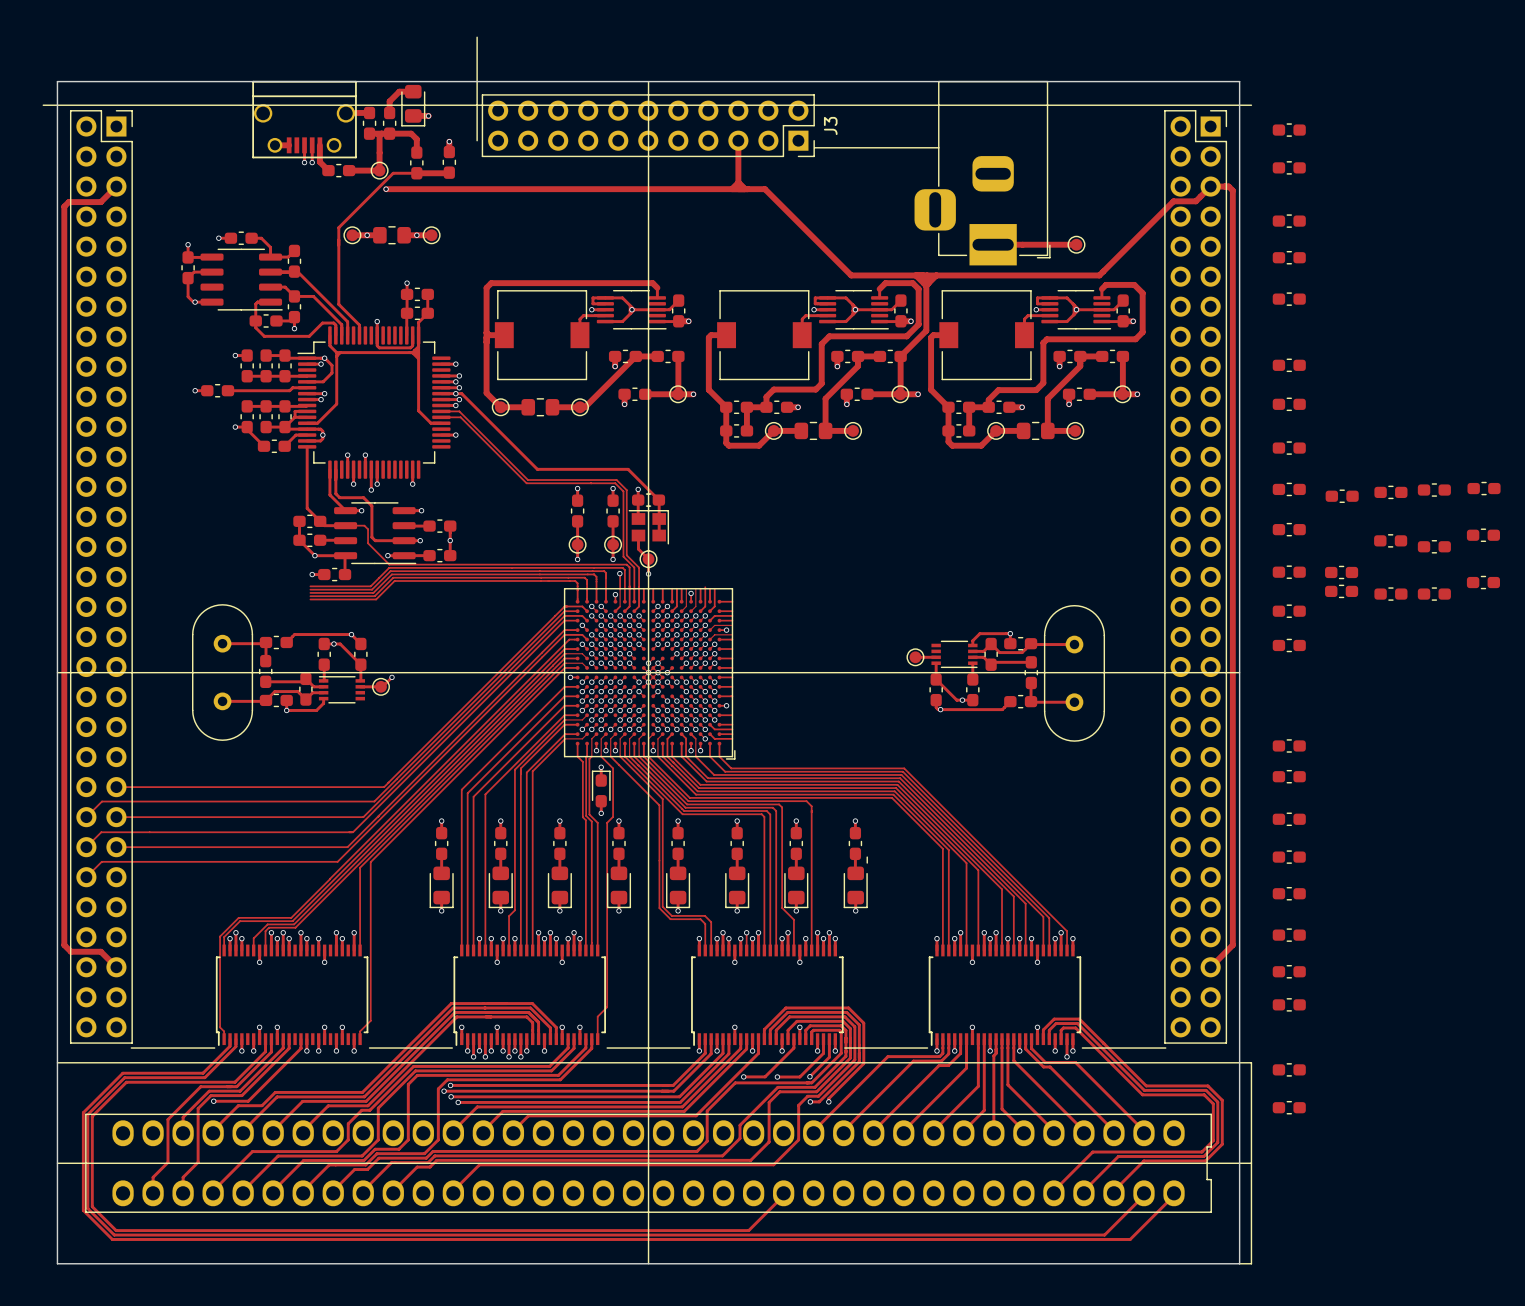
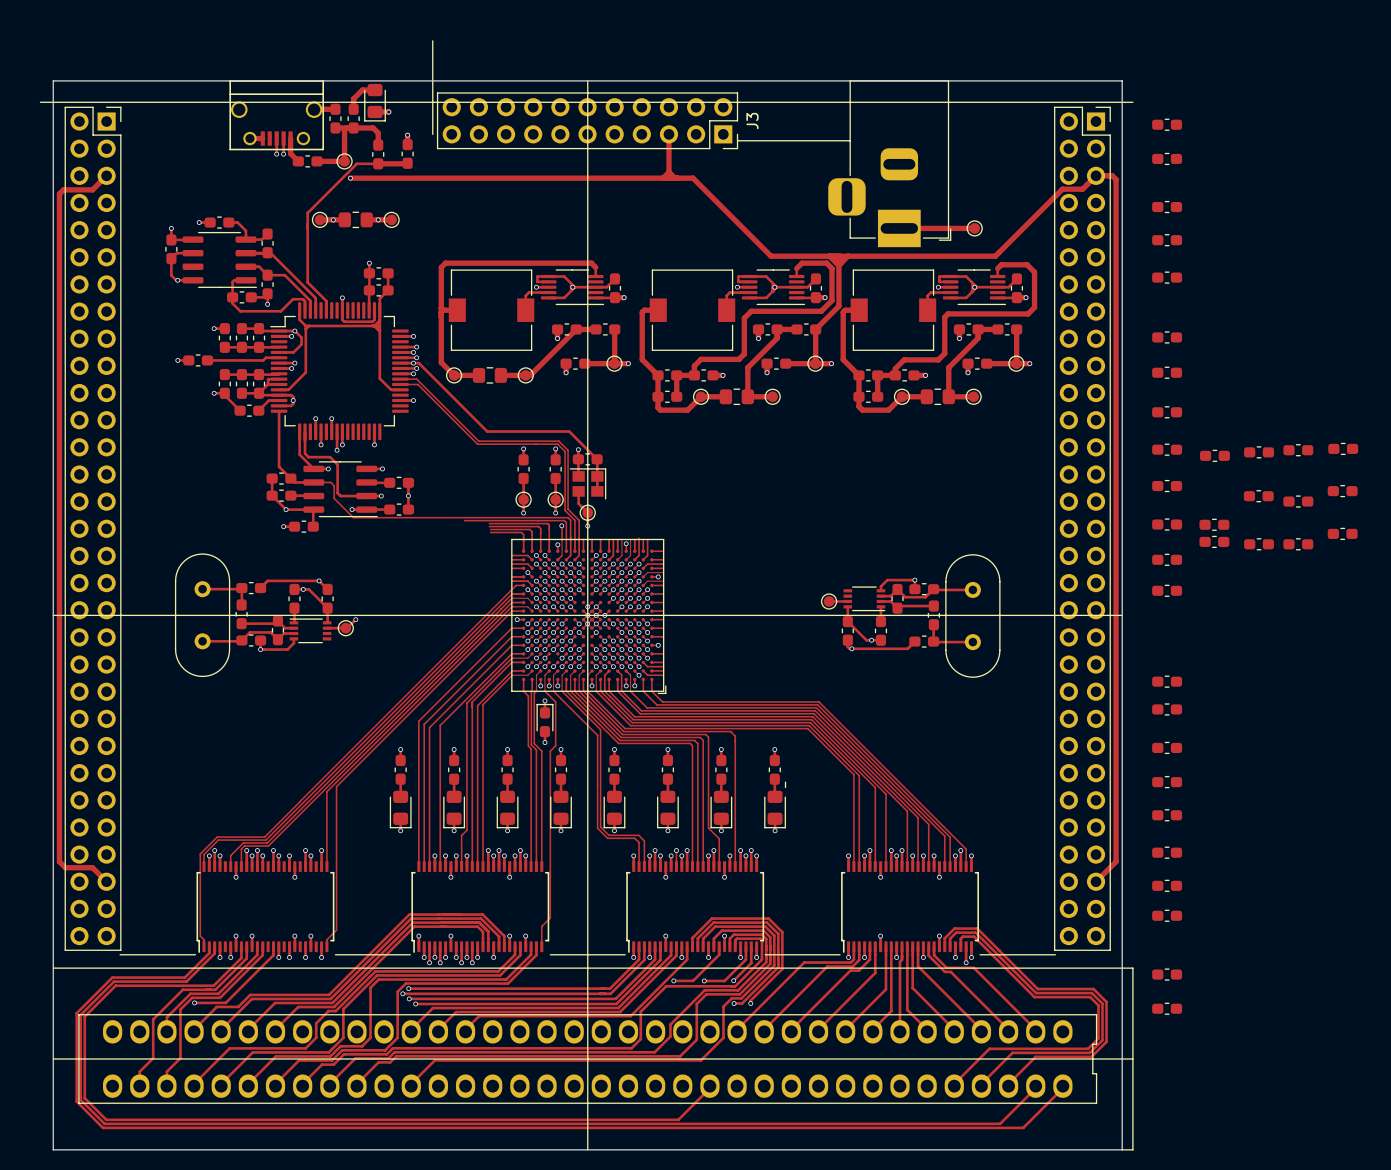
track: (512, 567) (389, 567) (370, 586) (310, 586) -> none
track: (539, 571) (390, 571) (372, 589) (310, 589) -> none
track: (539, 574) (391, 574) (373, 592) (310, 592) -> none
track: (541, 577) (393, 577) (374, 596) (310, 596) -> none
track: (540, 581) (394, 581) (376, 599) (310, 599) -> none
track: (564, 606) (384, 787) (116, 787) -> none
track: (564, 611) (396, 779) -> none
track: (564, 615) (363, 817) (116, 817) -> none
track: (564, 620) (352, 832) (101, 832) (86, 847) -> none
track: (564, 630) (347, 847) (116, 847) -> none
track: (564, 634) (337, 861) (101, 861) (86, 877) -> none
track: (396, 779) (374, 801) (102, 801) (86, 817) -> none

